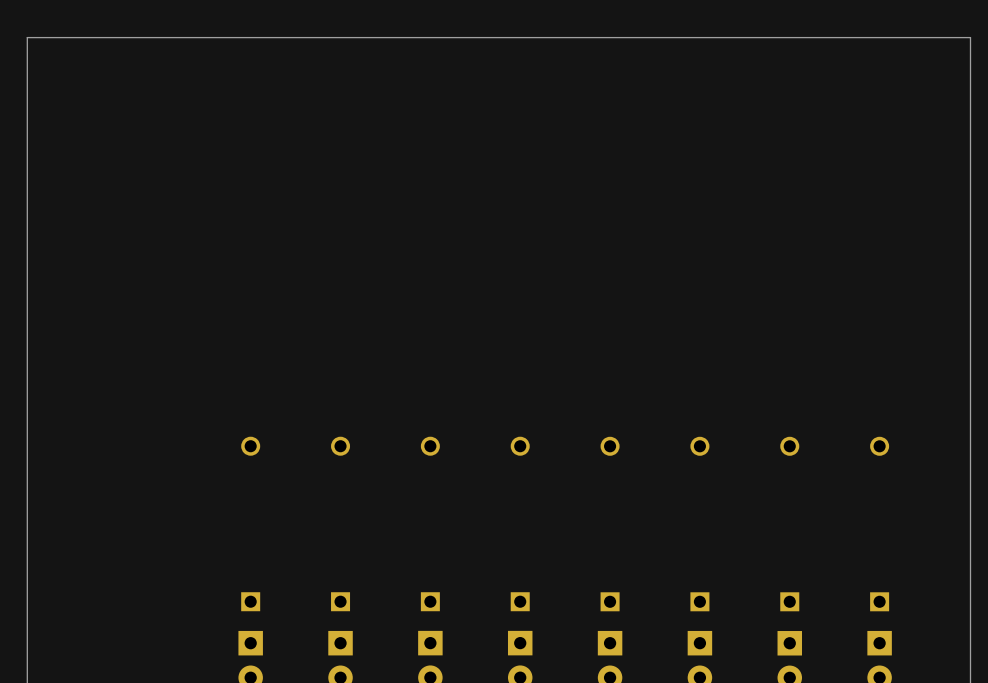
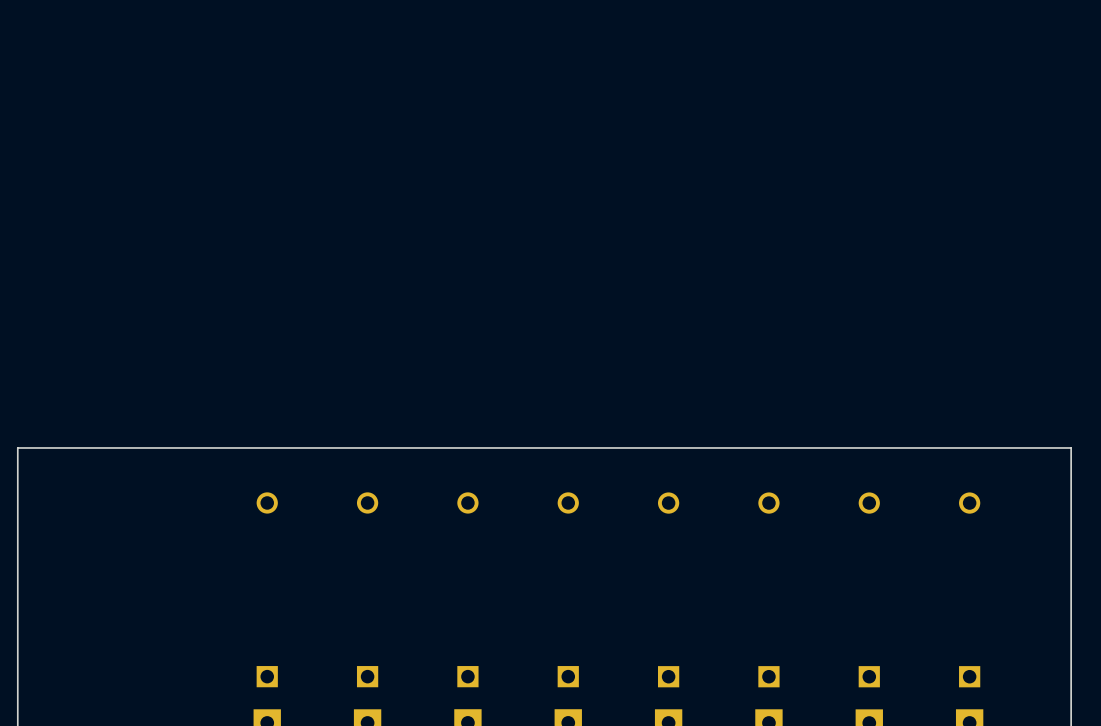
board edge: (970, 396) (970, 37) (27, 37) (27, 396) -> (1071, 447) (17, 447)

